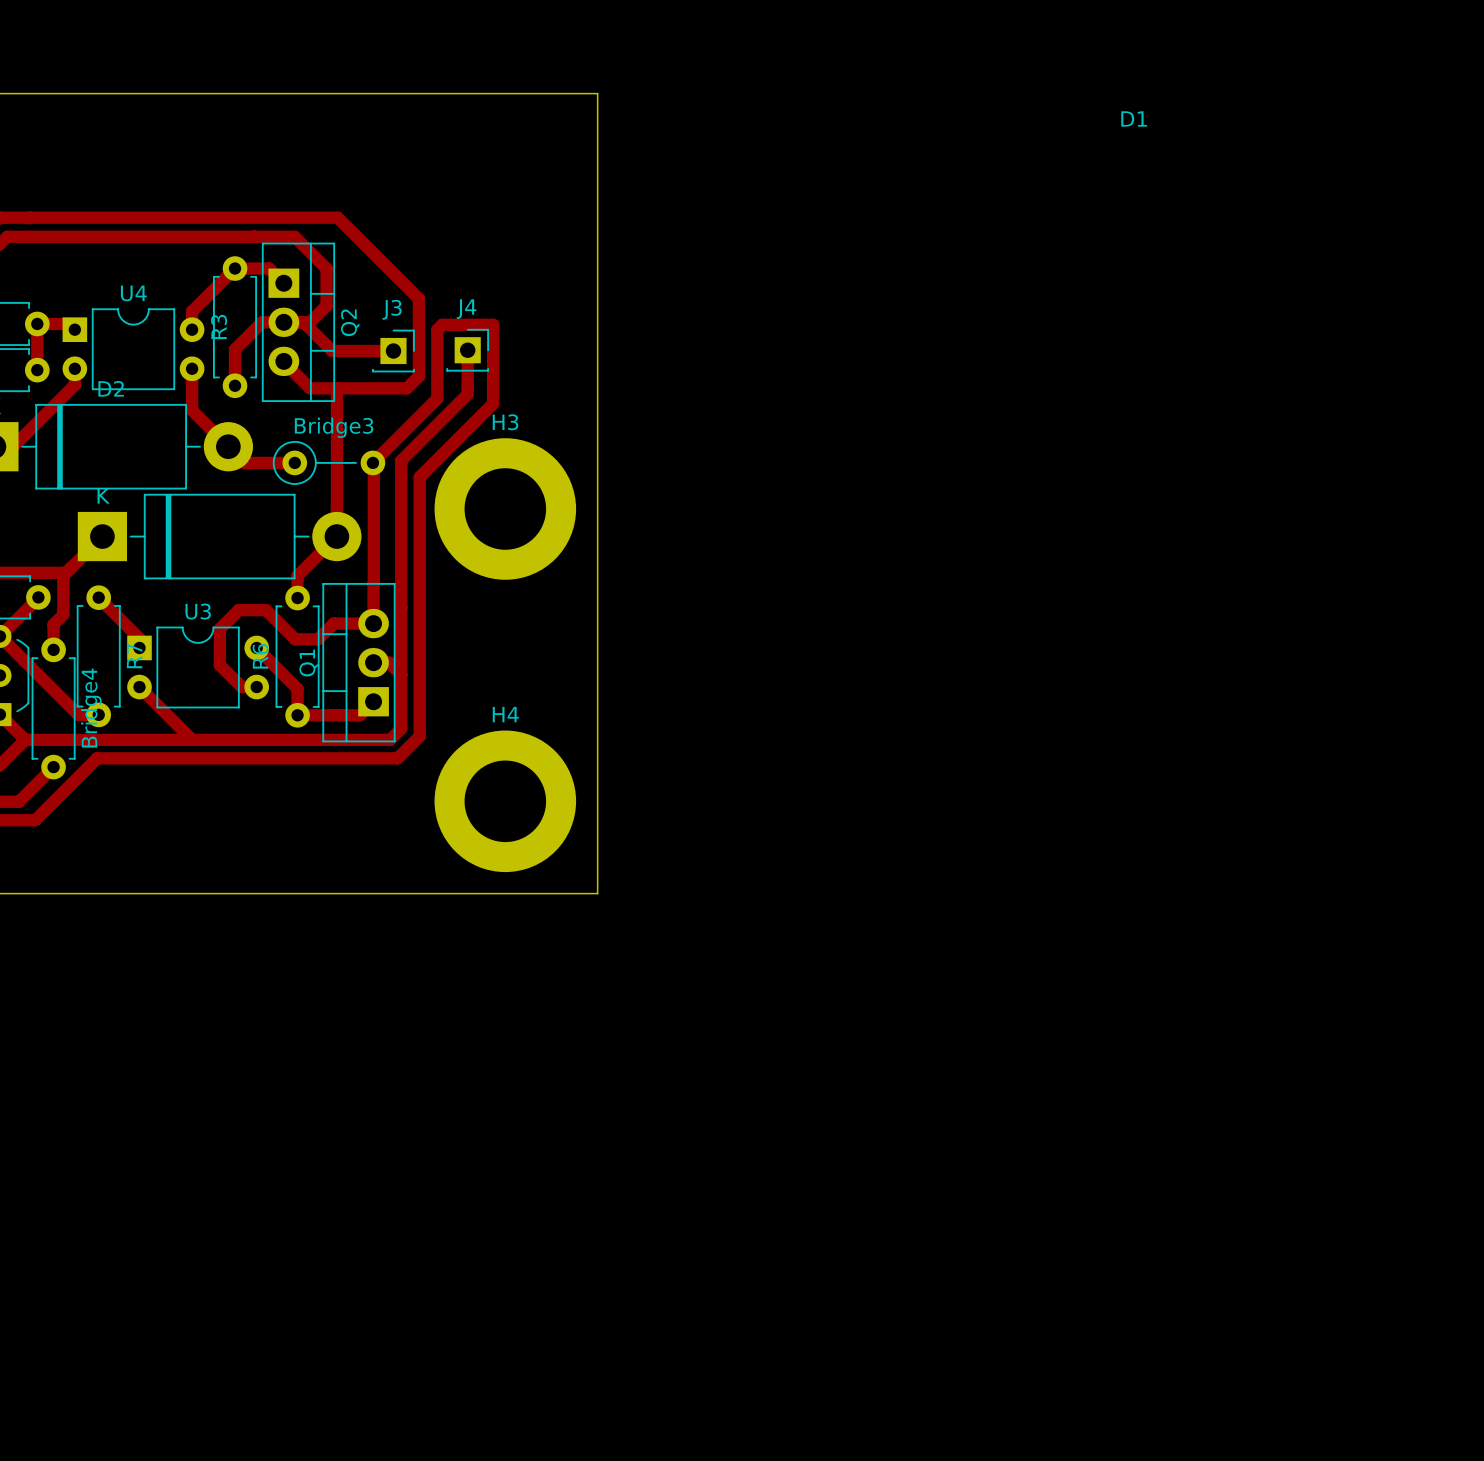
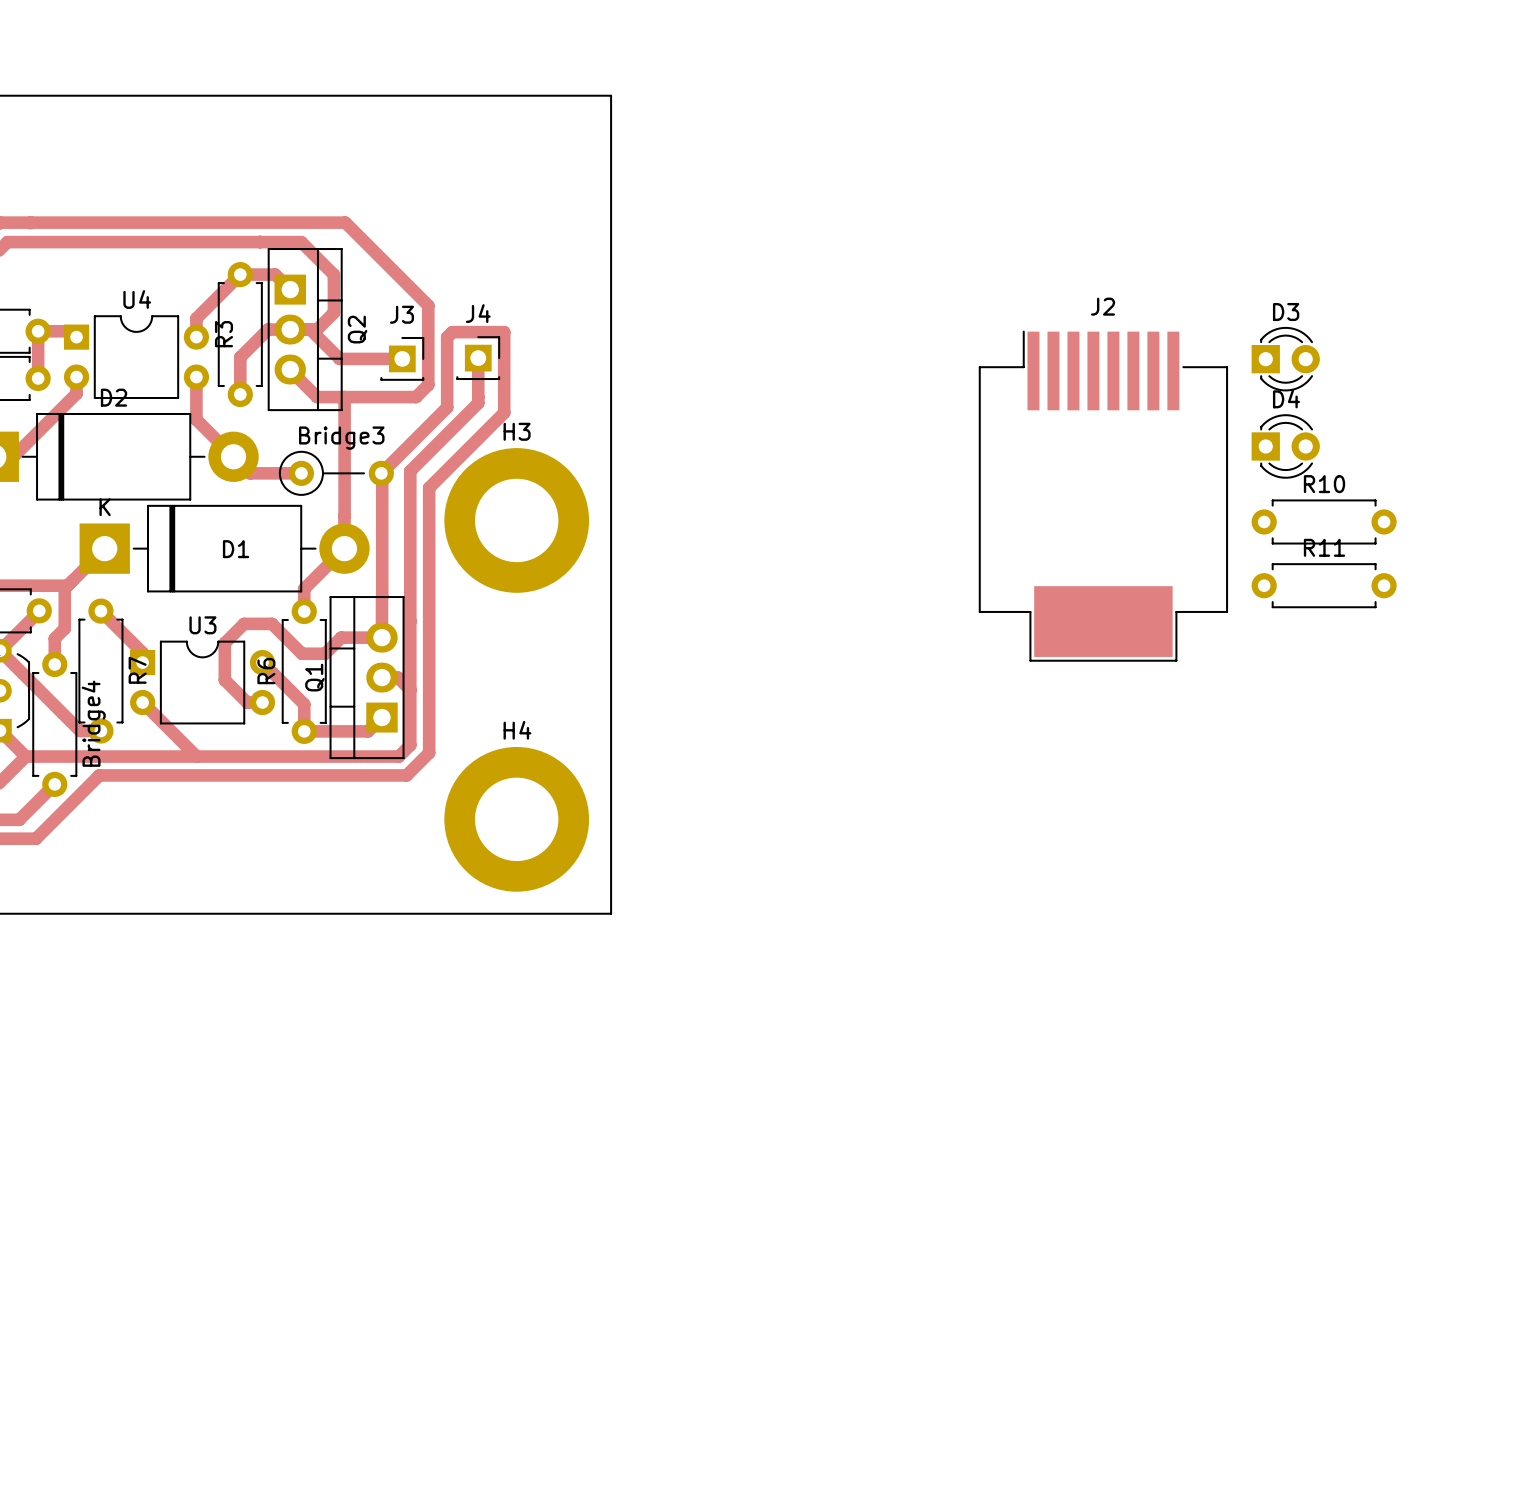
D1 name position: D1 (1134, 118) -> D1 (236, 549)
D3: none -> (1285, 359)
D4: none -> (1285, 446)
J2: none -> (1103, 496)
R10: none -> (1324, 521)
R11: none -> (1324, 585)

